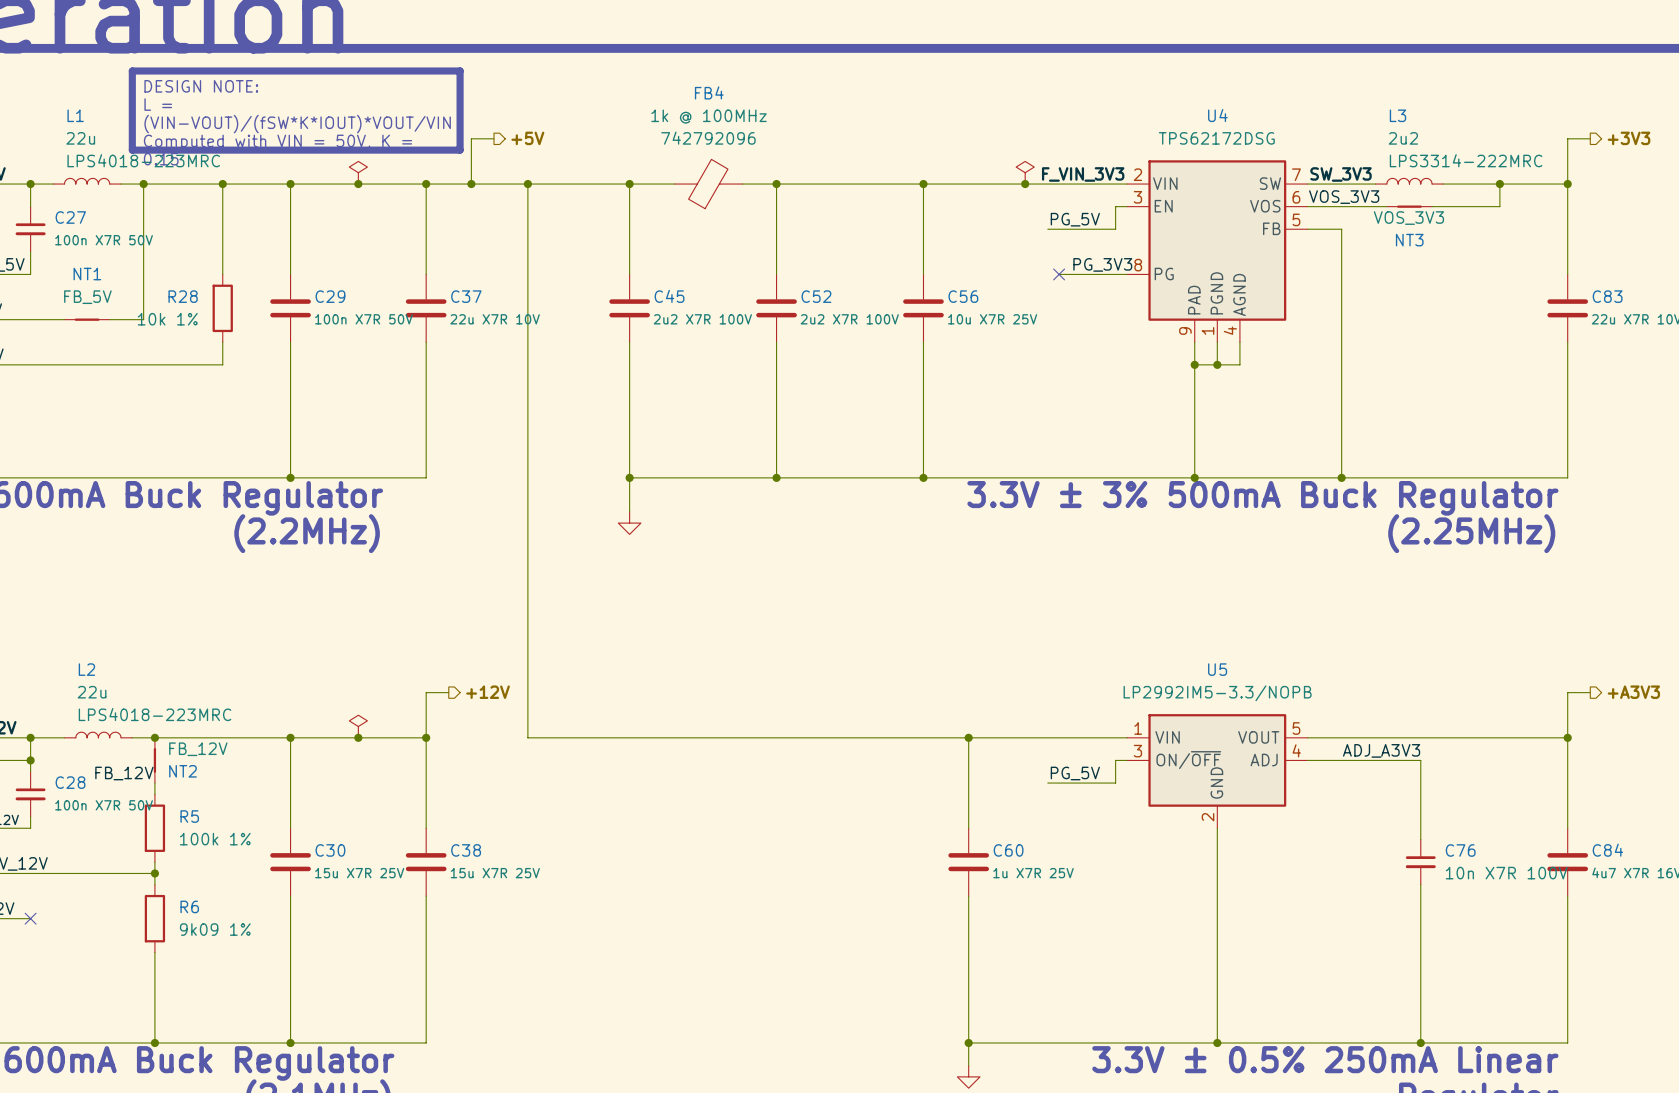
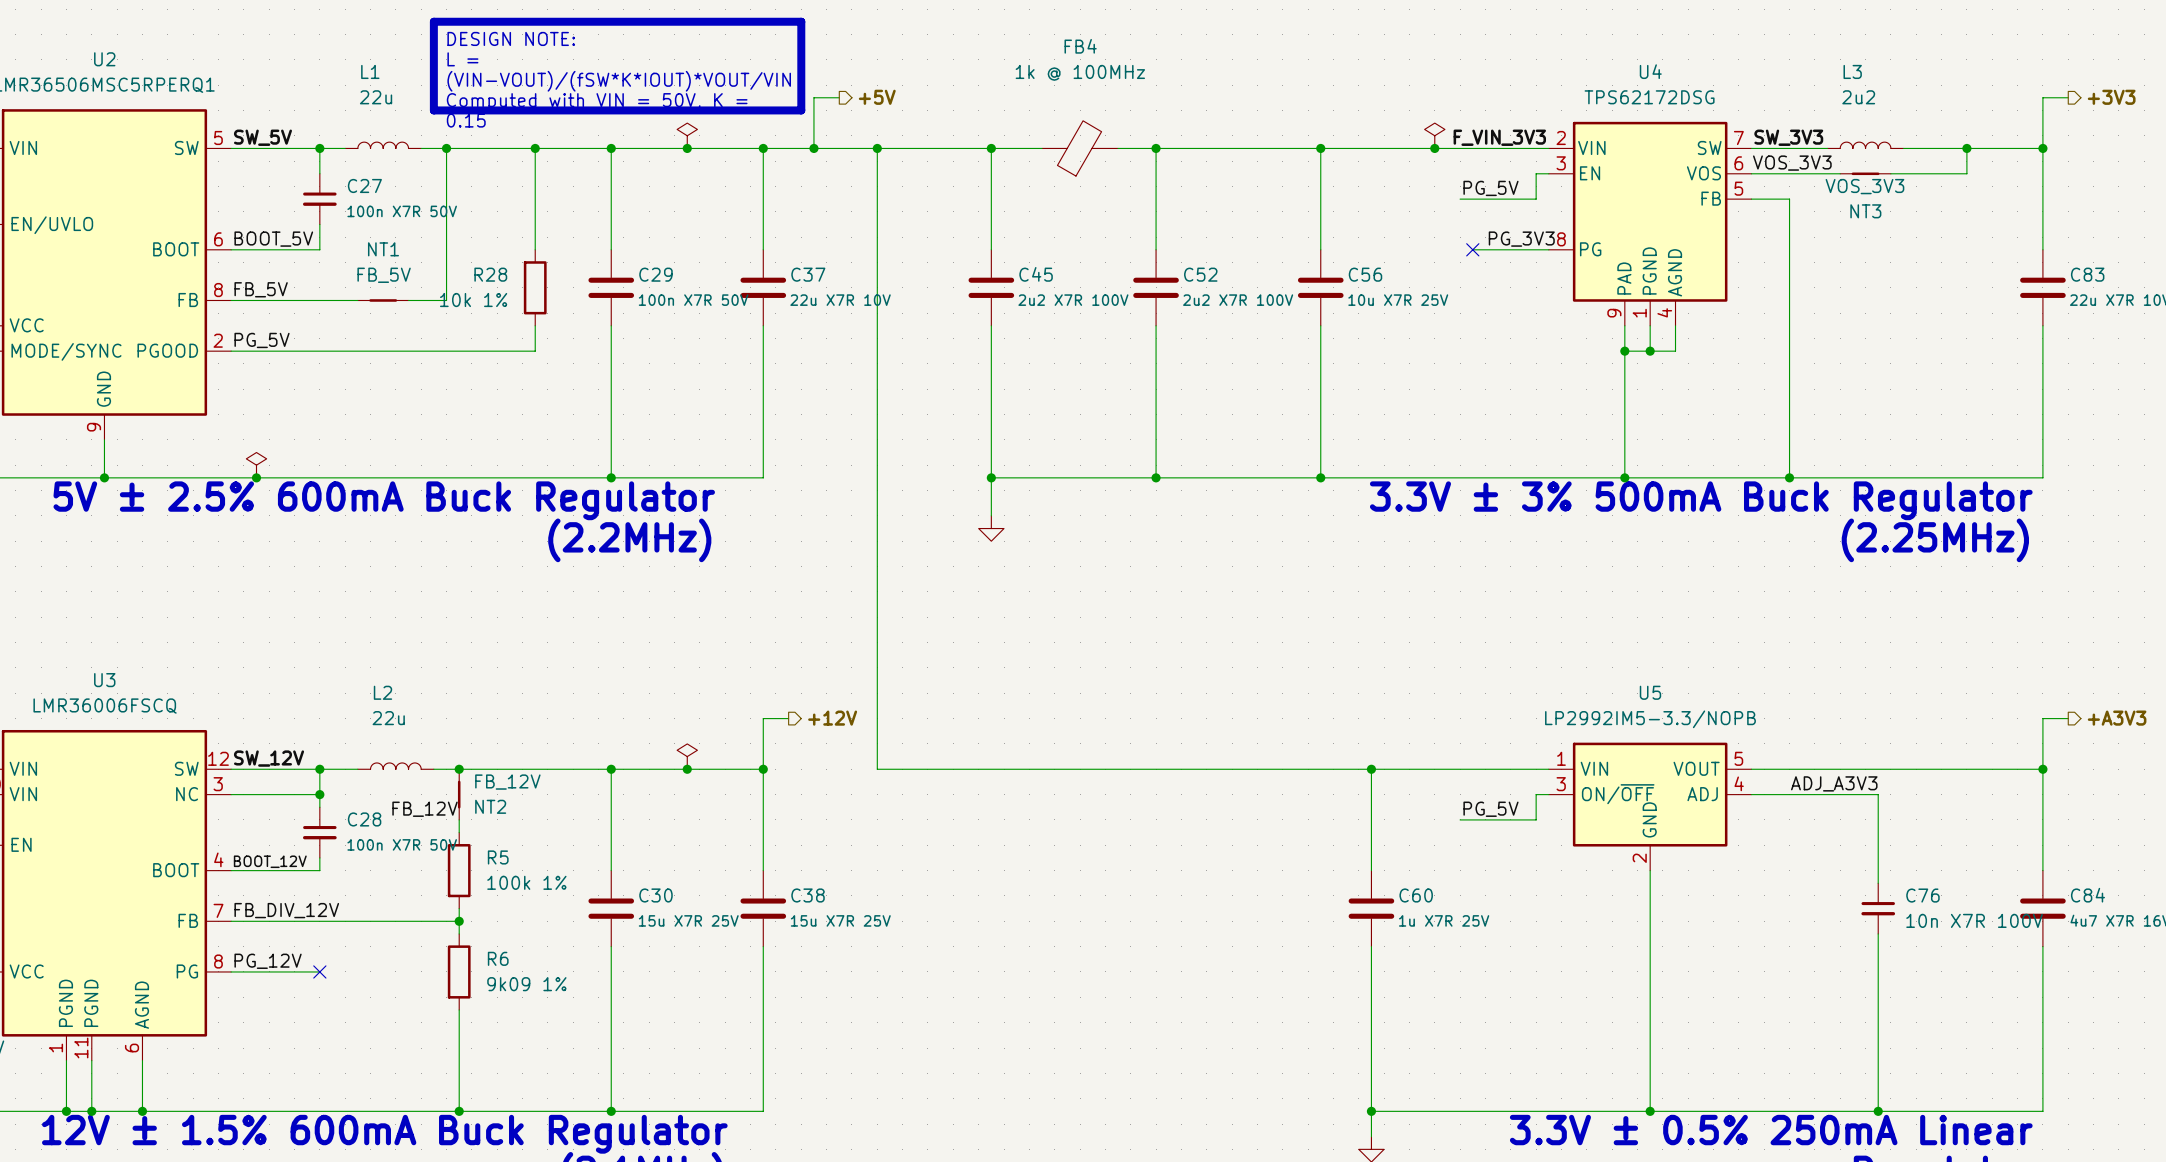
FB4 text: 742792096 (708, 138) -> none
L1 text: LPS4018-223MRC (143, 160) -> none
L3 text: LPS3314-222MRC (1466, 160) -> none
L2 text: LPS4018-223MRC (155, 714) -> none

